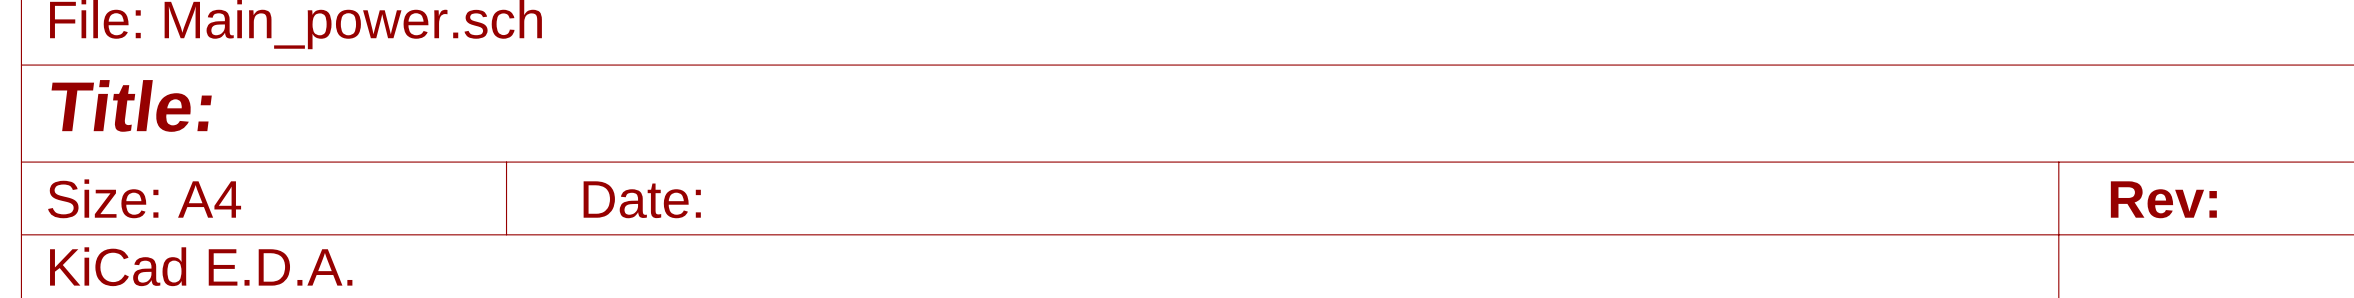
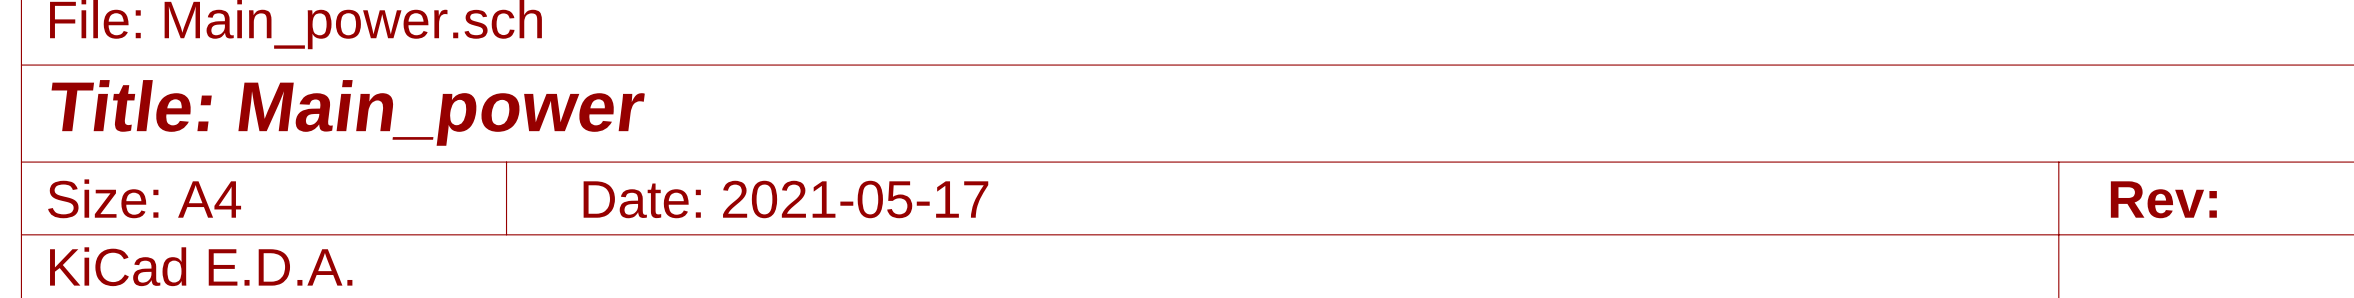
title block: Title: (131, 105) -> Title: Main_power (348, 112)
title block: Date: (642, 199) -> Date: 2021-05-17 (785, 199)

